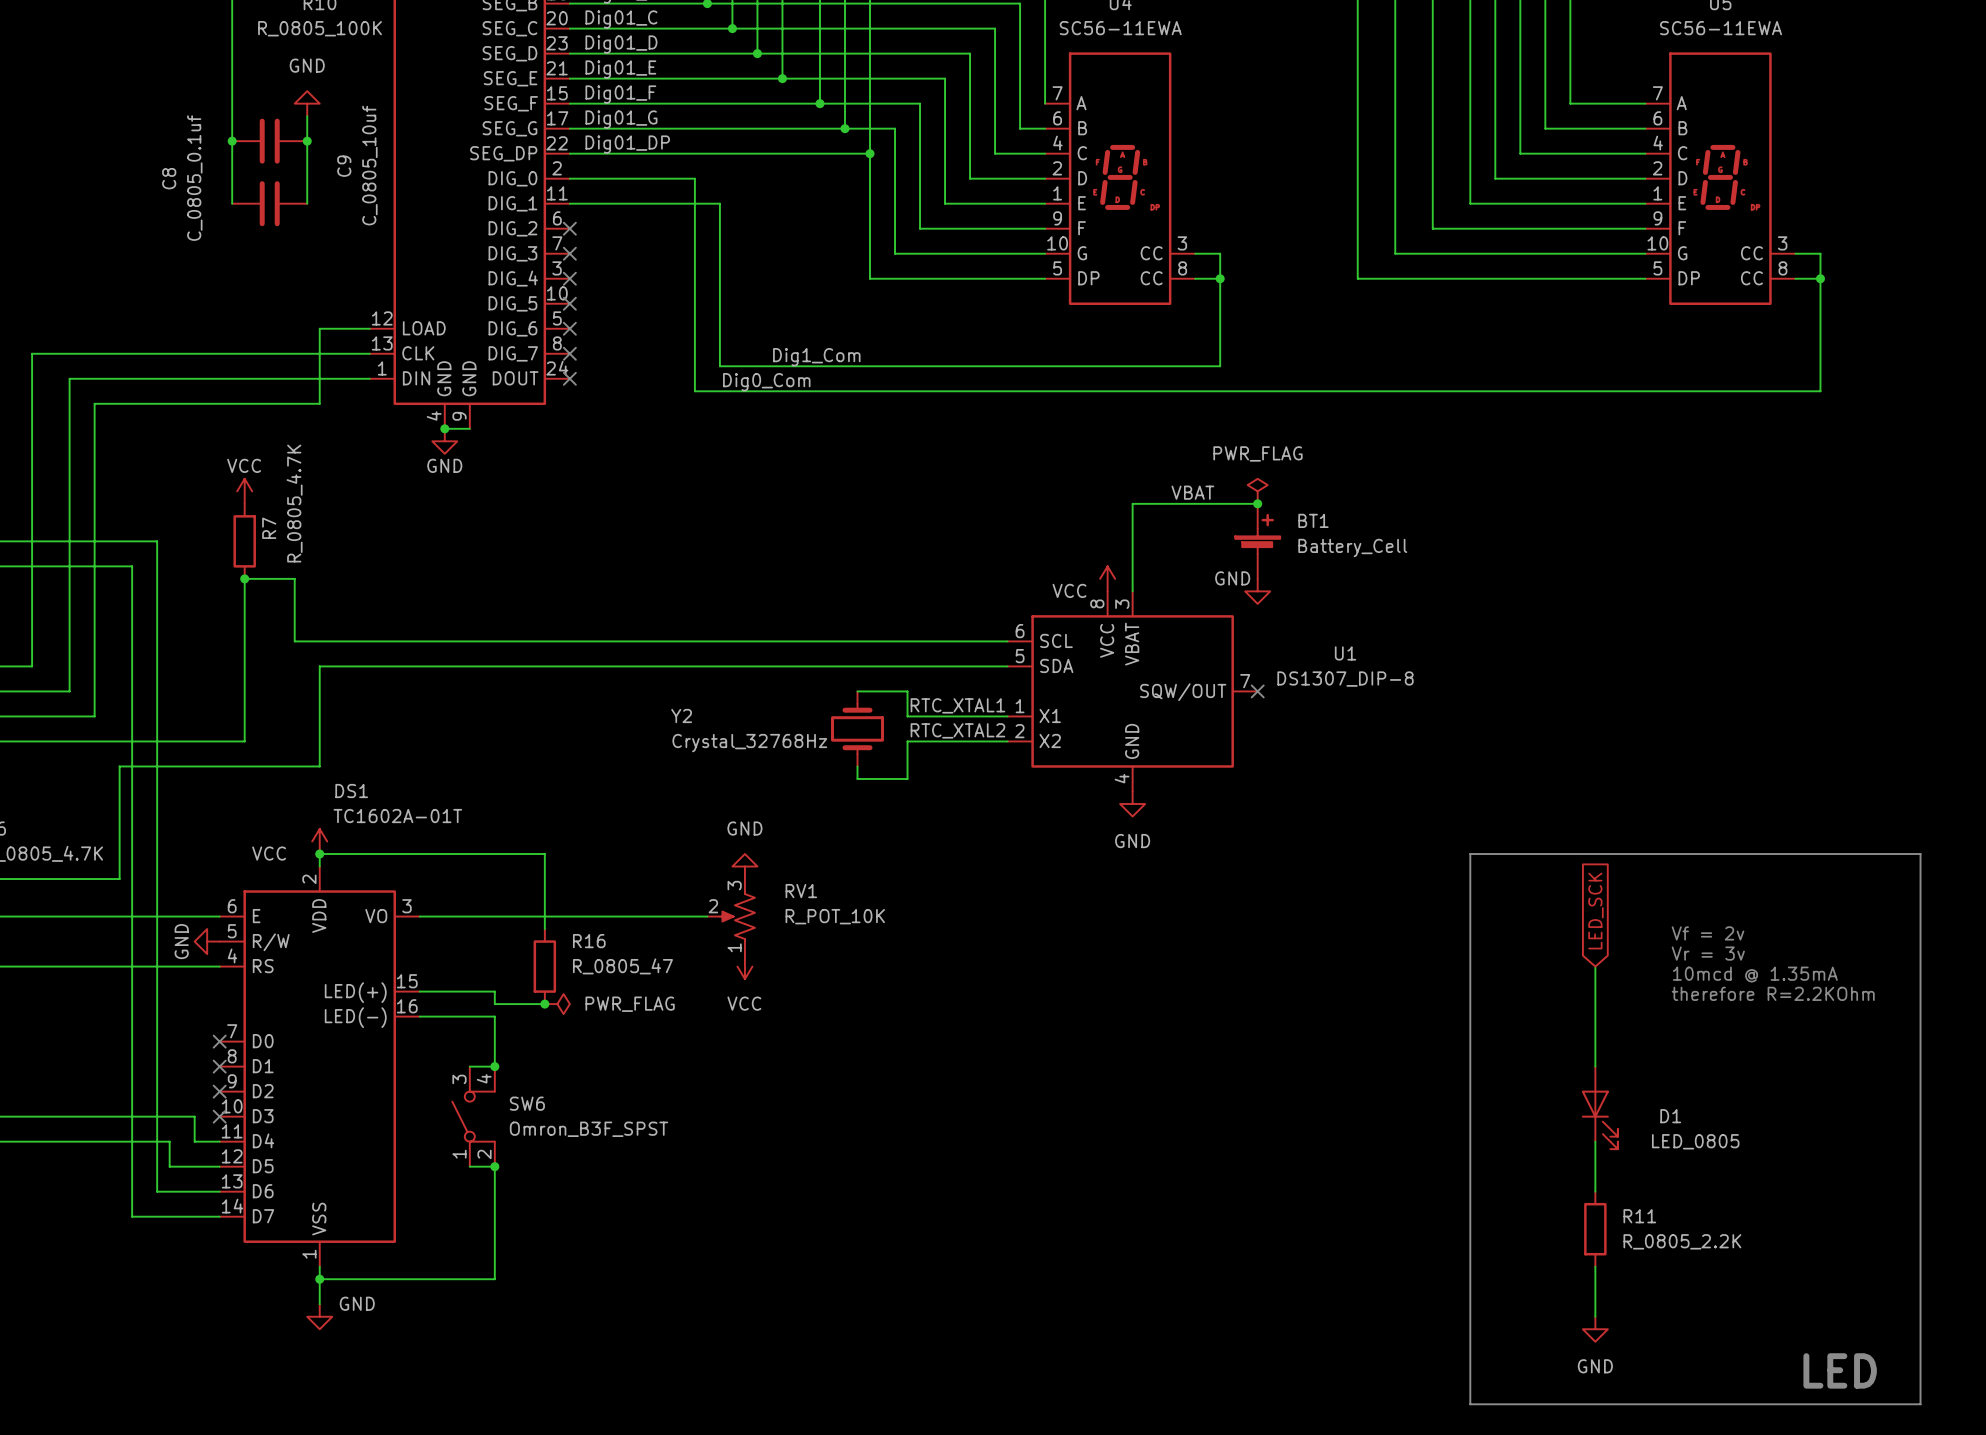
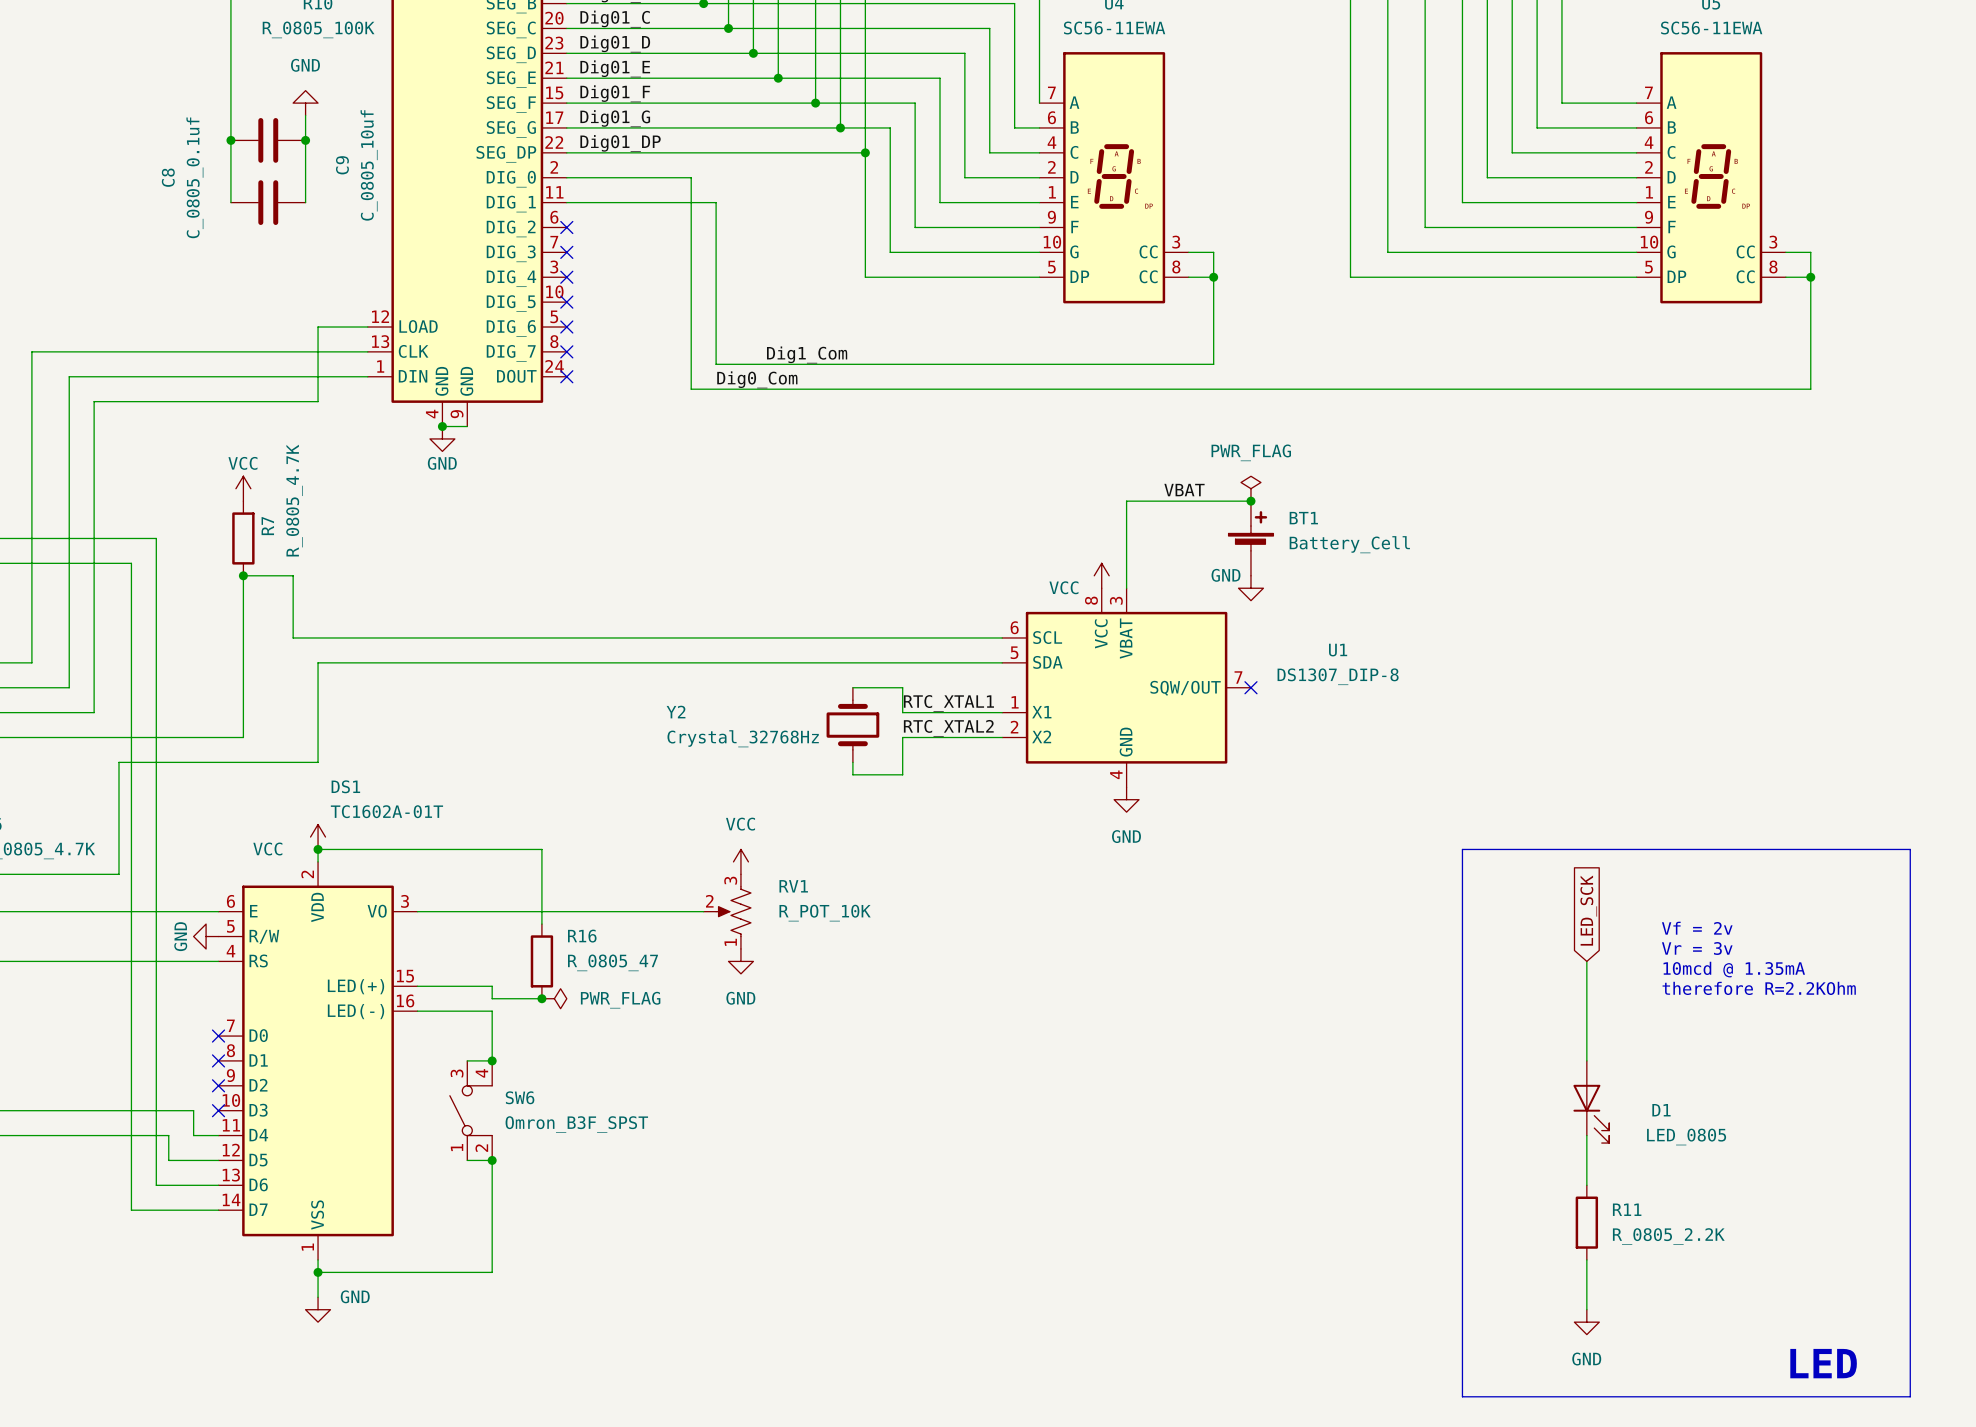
power symbol: GND (744, 866) -> VCC (740, 861)
power symbol: VCC (744, 966) -> GND (740, 961)

